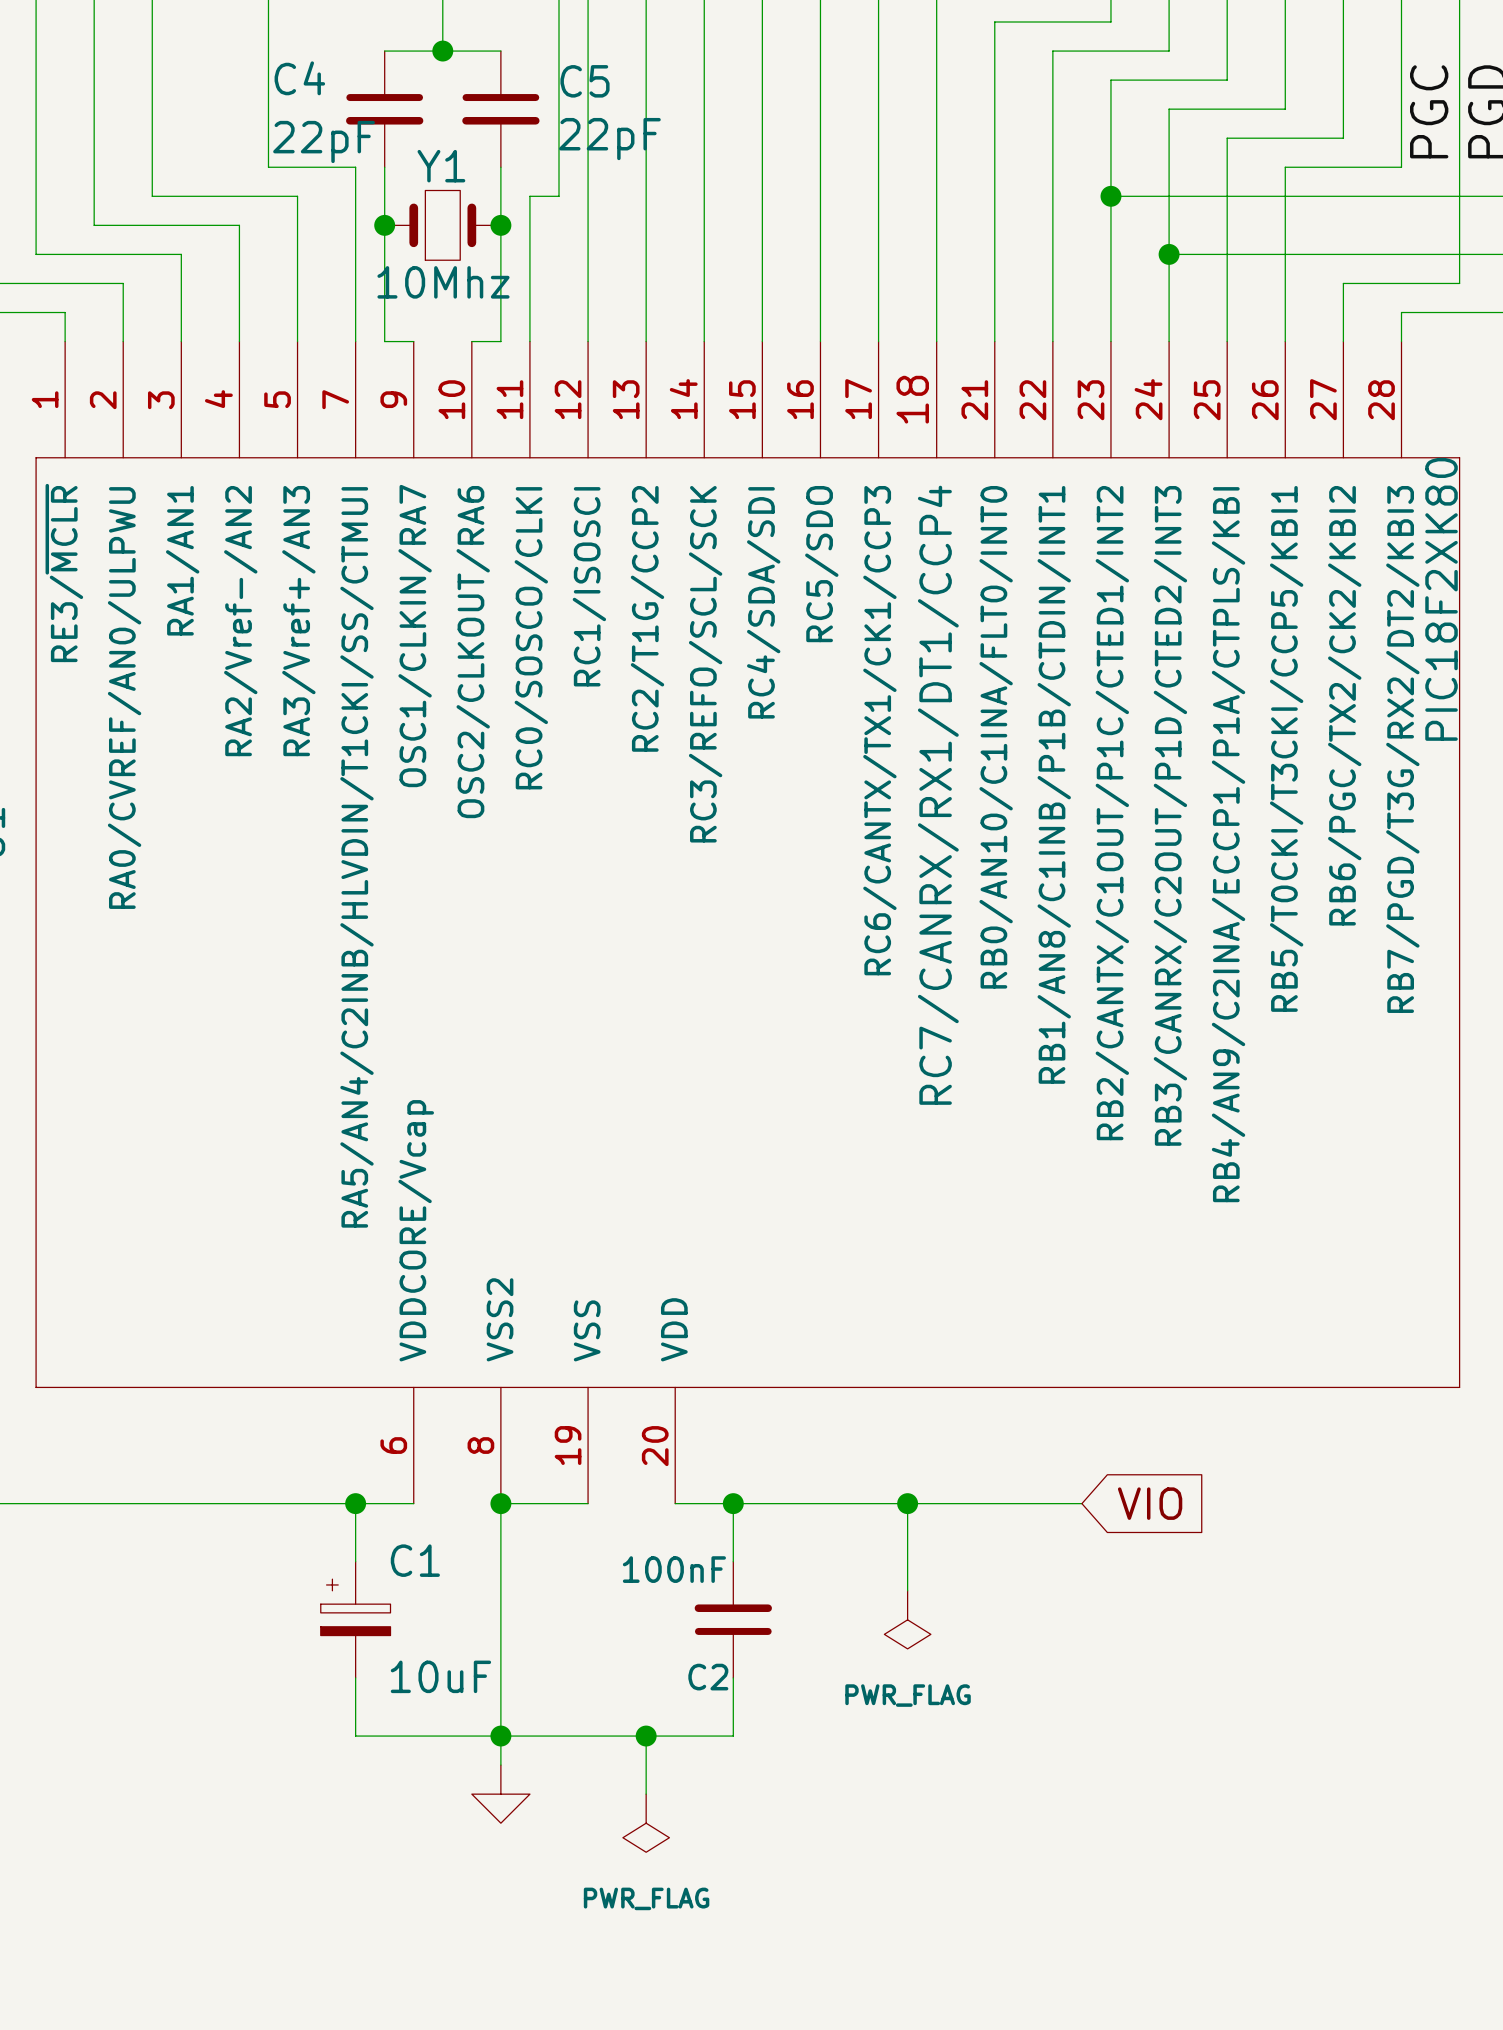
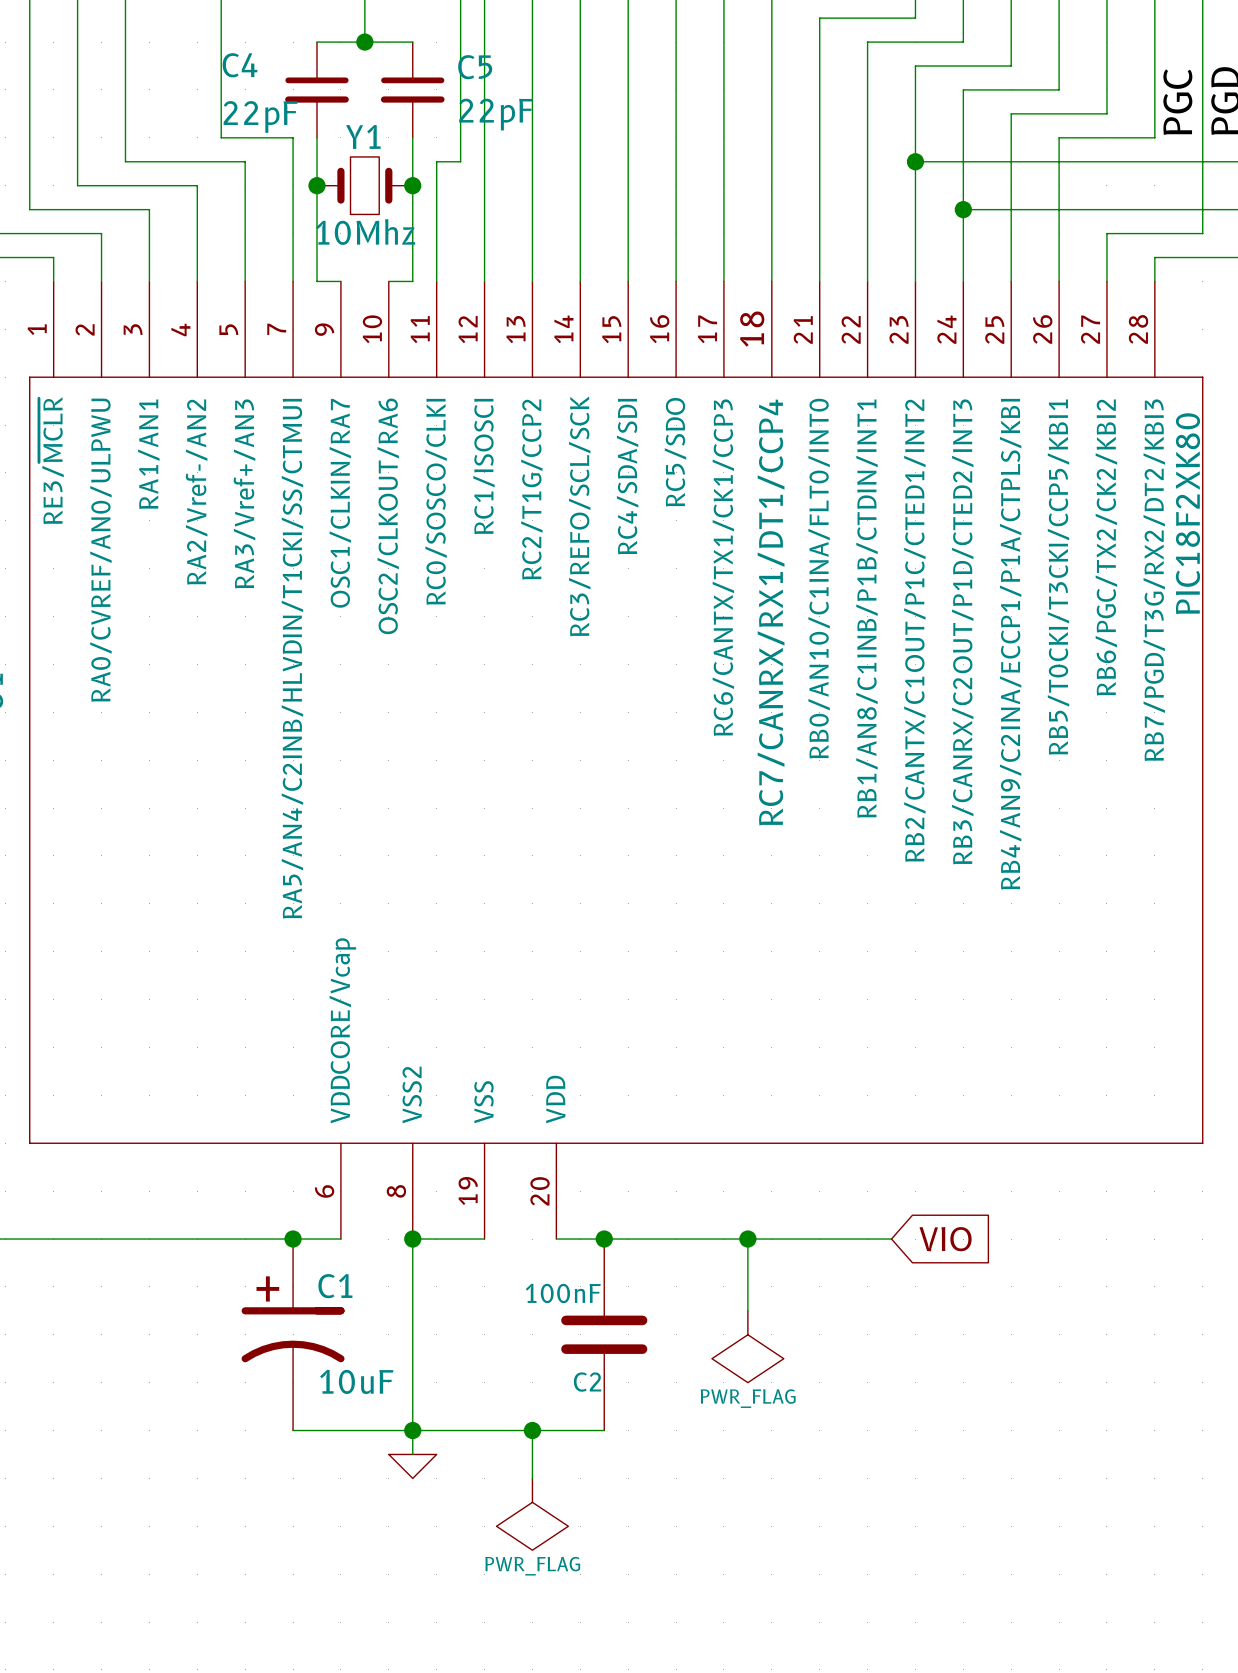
C1 symbol: [320, 1561, 391, 1678] -> [241, 1239, 345, 1431]
C2 symbol: [694, 1561, 772, 1678] -> [561, 1239, 648, 1431]
power symbol shape: [884, 1590, 931, 1649] -> [711, 1310, 784, 1383]
power symbol shape: [471, 1765, 530, 1824] -> [388, 1454, 437, 1479]
power symbol shape: [622, 1794, 670, 1853] -> [496, 1478, 569, 1551]

